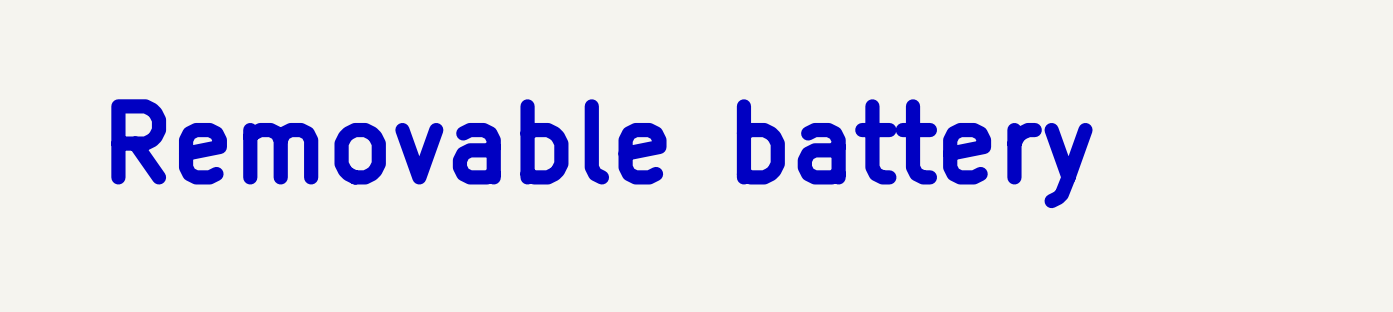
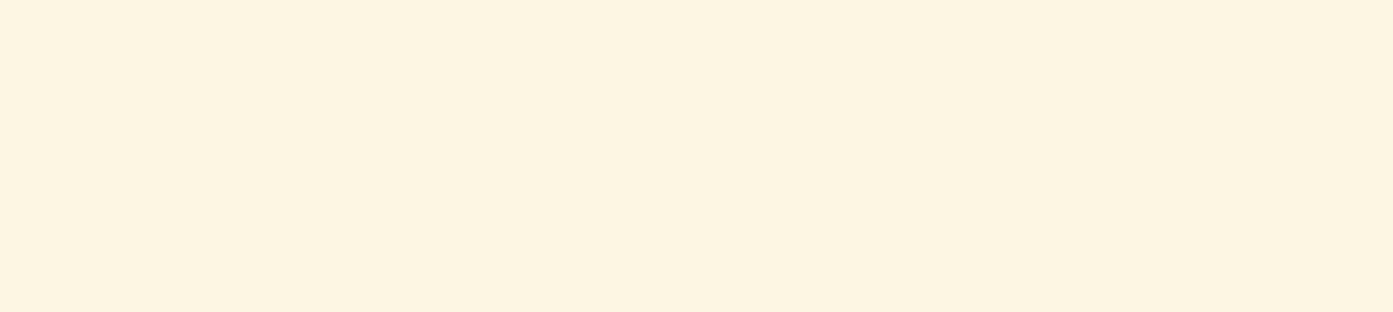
text: Removable battery (601, 153) -> none

